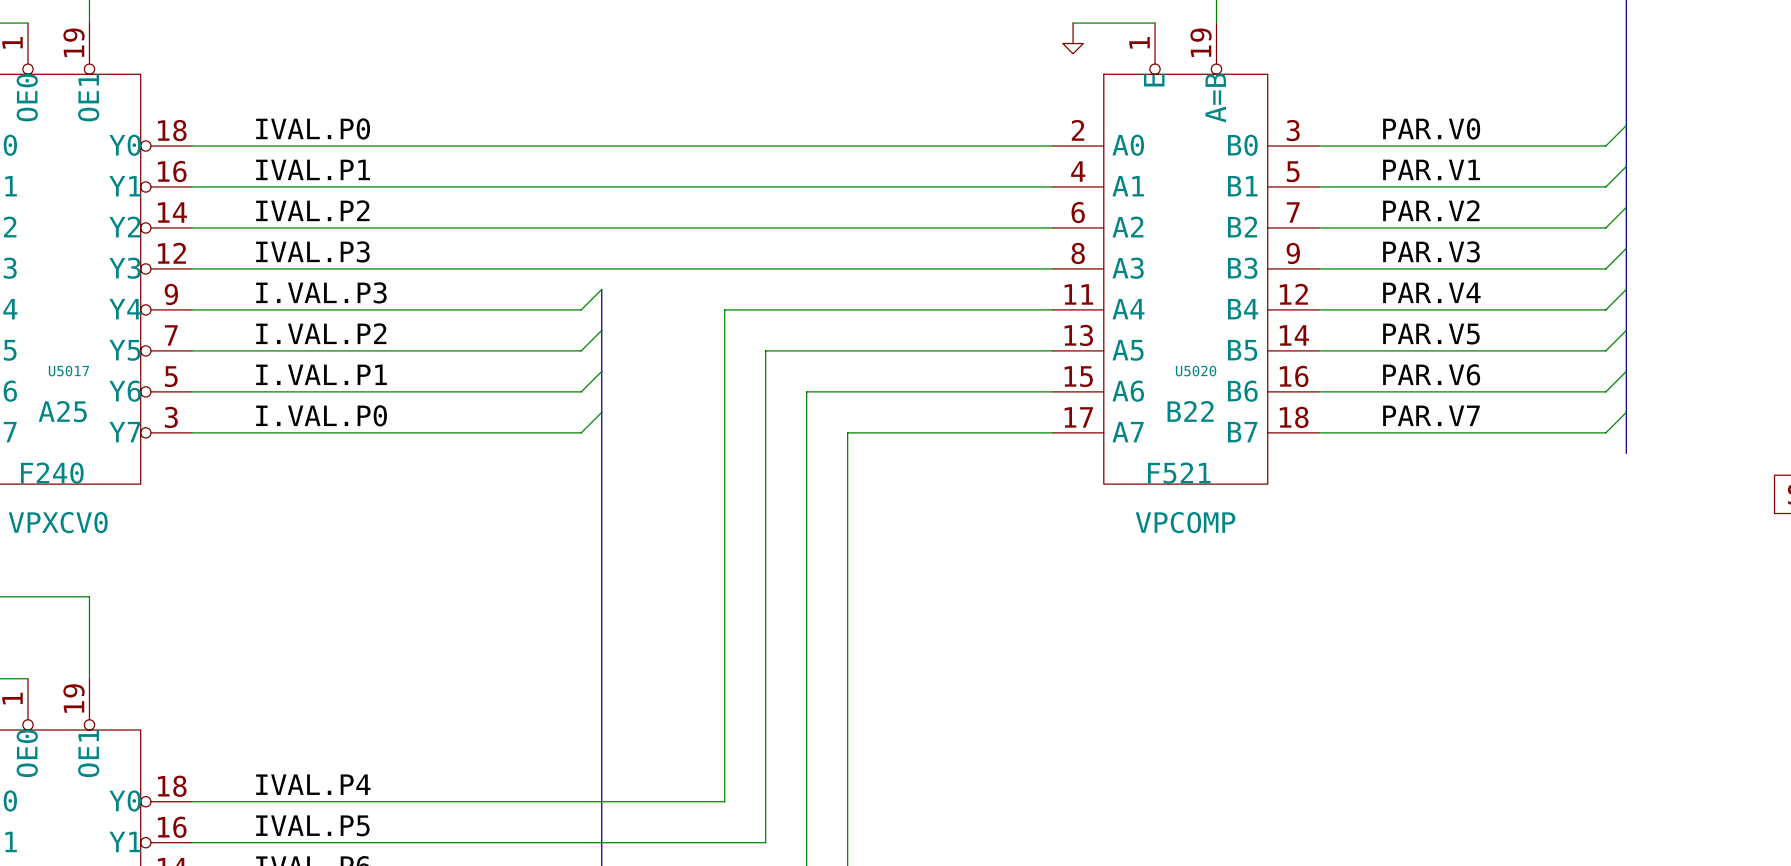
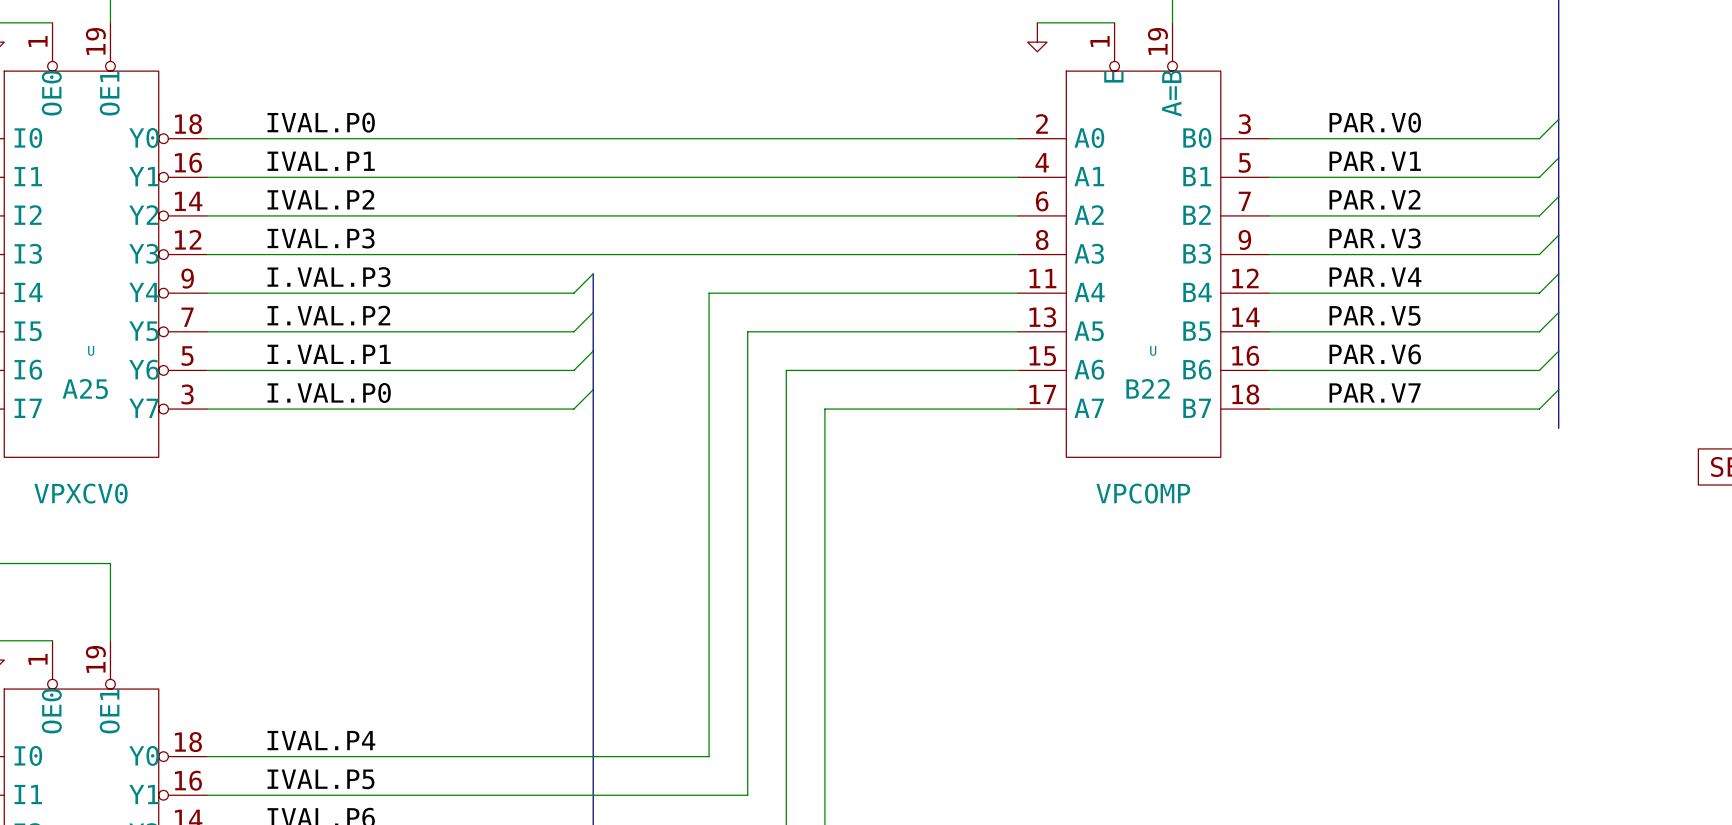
U5017 name: U5017 (68, 371) -> U (91, 350)
U5020 name: U5020 (1196, 371) -> U (1153, 350)
U5017 value: F240 (52, 473) -> none
U5020 value: F521 (1179, 473) -> none

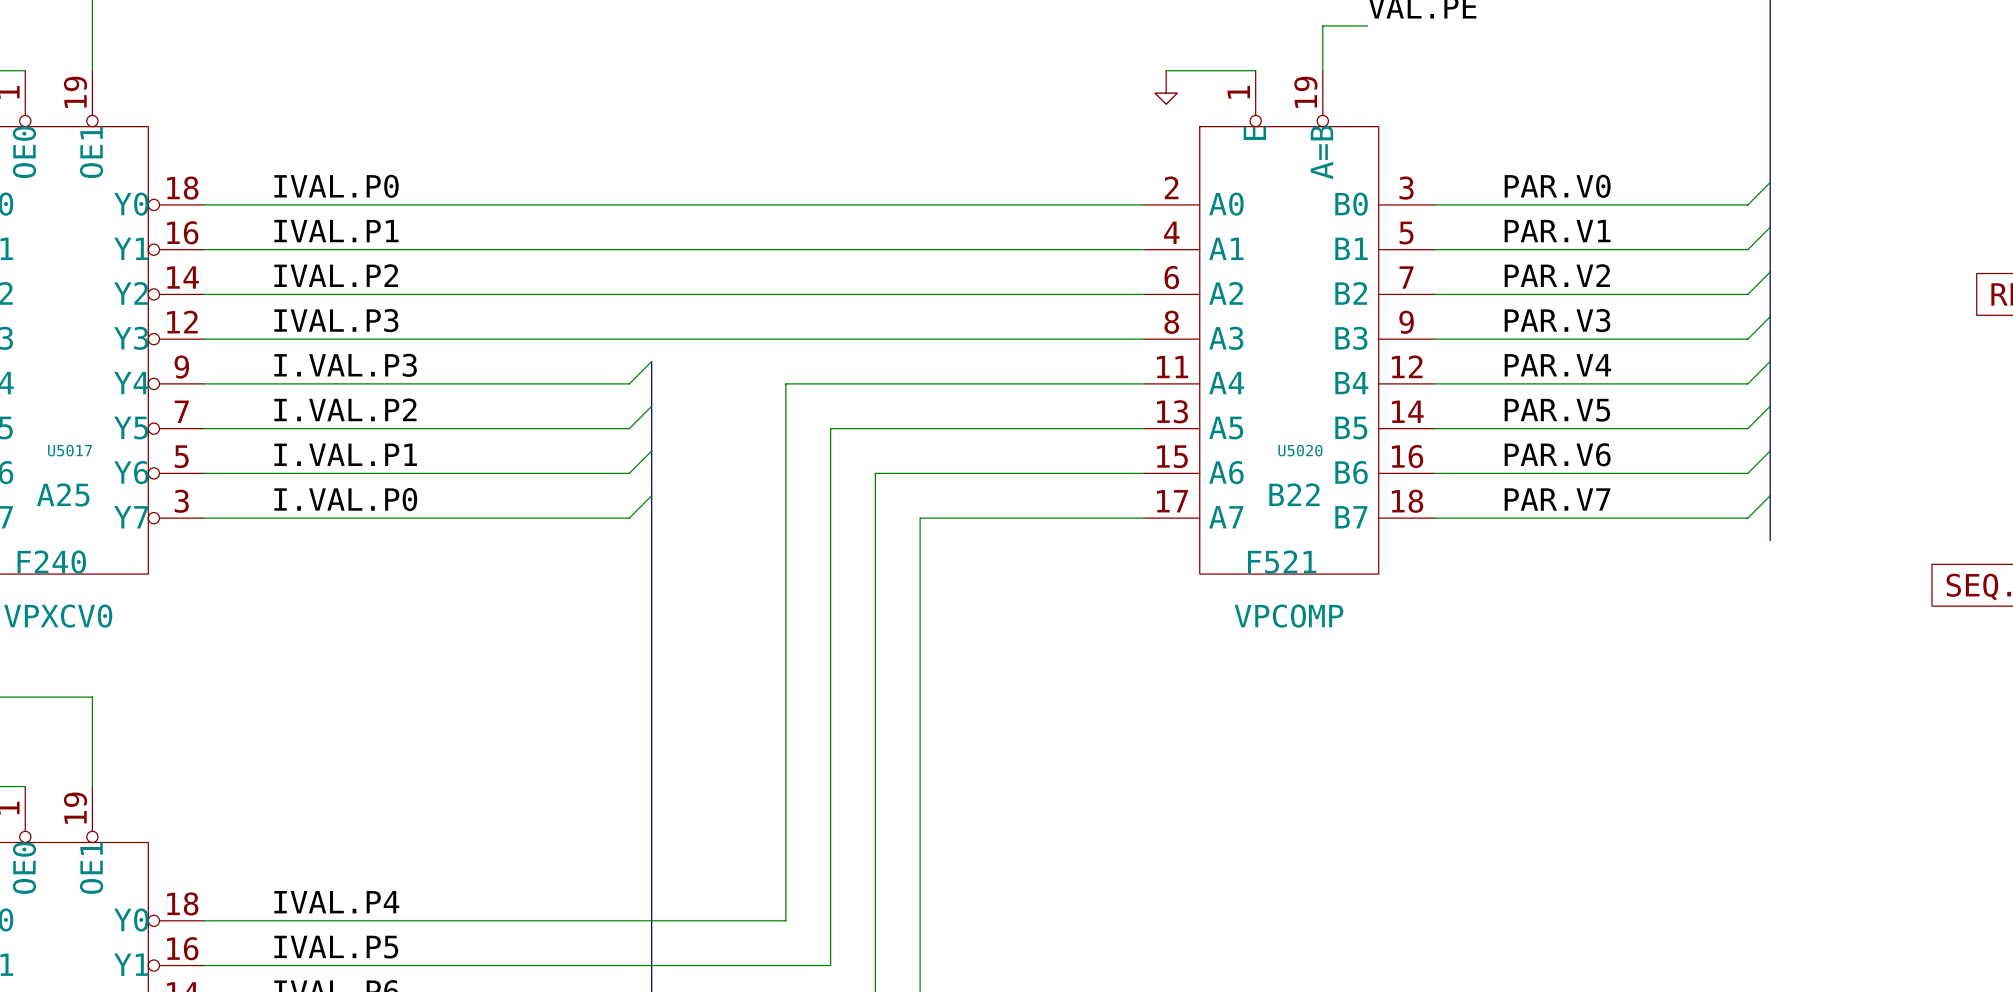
U name: U (91, 350) -> U5017 (70, 450)
U name: U (1153, 350) -> U5020 (1300, 450)
U value: none -> F240 (51, 562)
U value: none -> F521 (1282, 562)

